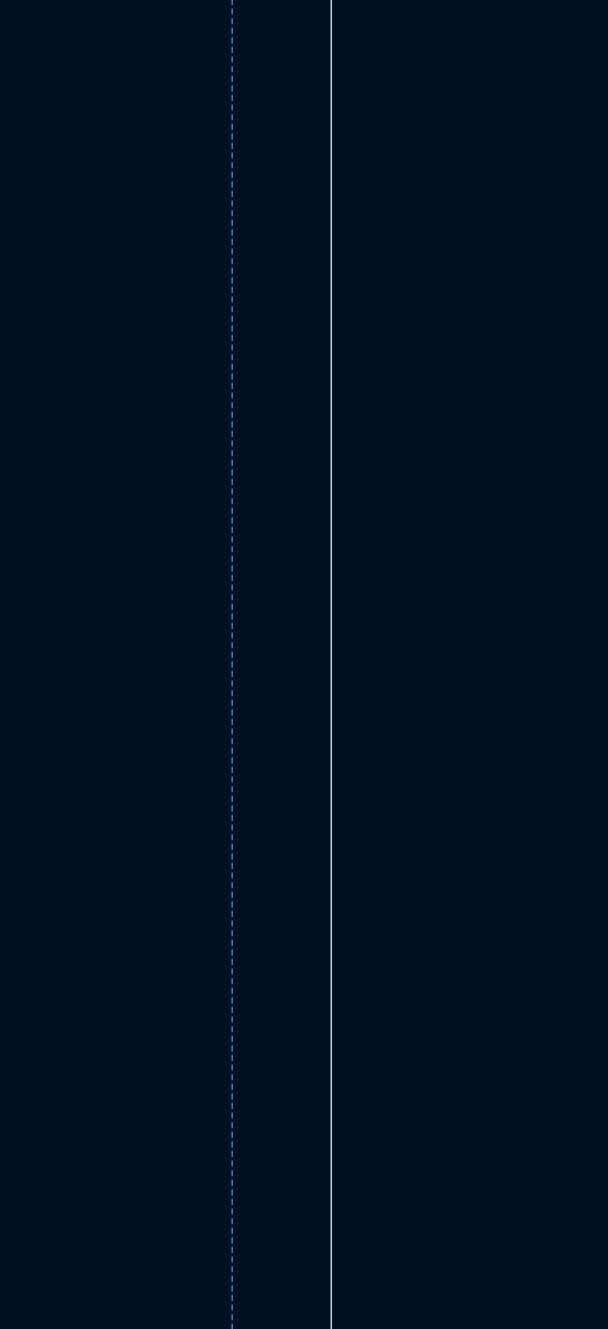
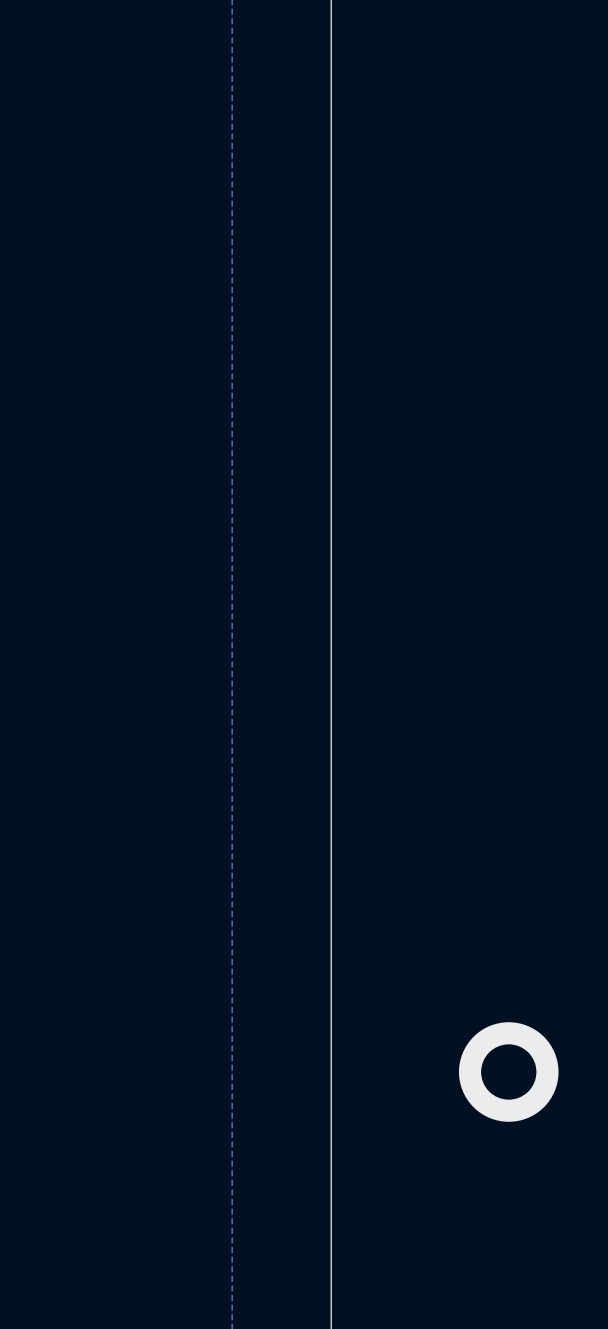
via: none -> (508, 1072)

